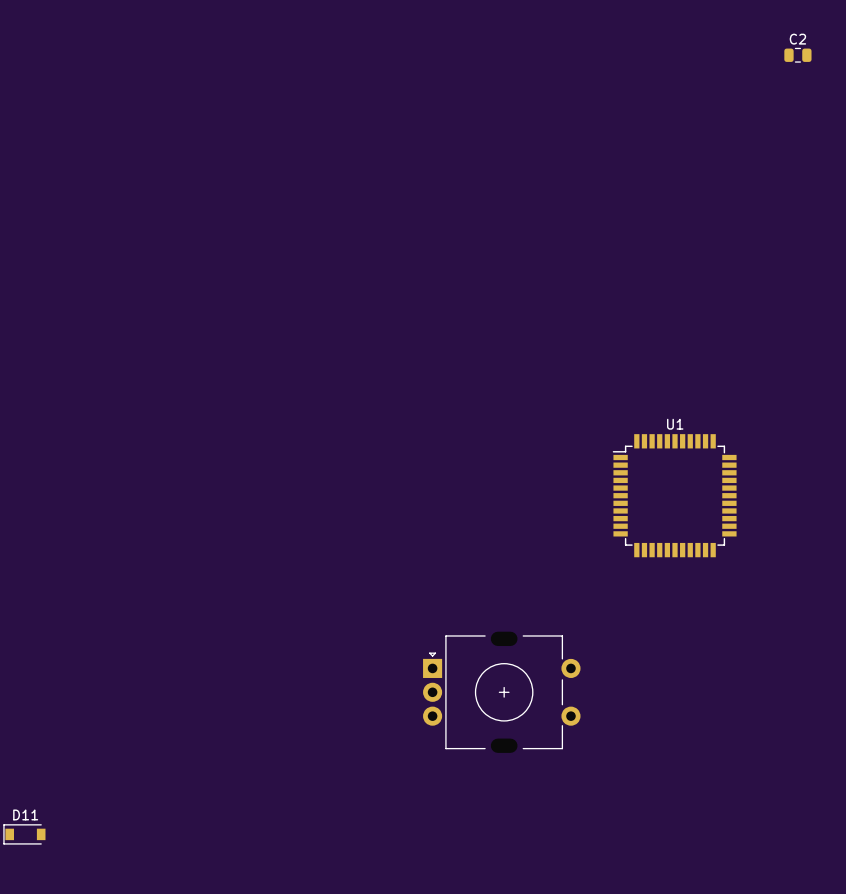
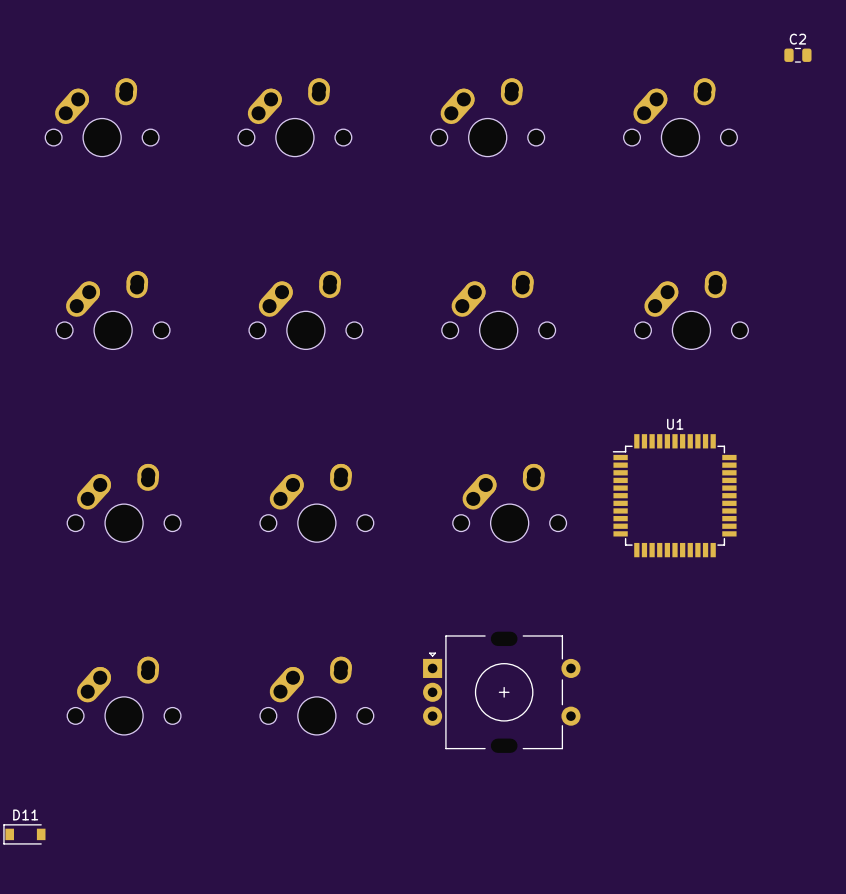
part: none -> (102, 117)
part: none -> (294, 117)
part: none -> (487, 117)
part: none -> (680, 117)
part: none -> (113, 310)
part: none -> (305, 310)
part: none -> (498, 310)
part: none -> (691, 310)
part: none -> (124, 503)
part: none -> (316, 503)
part: none -> (509, 503)
part: none -> (124, 695)
part: none -> (316, 695)

